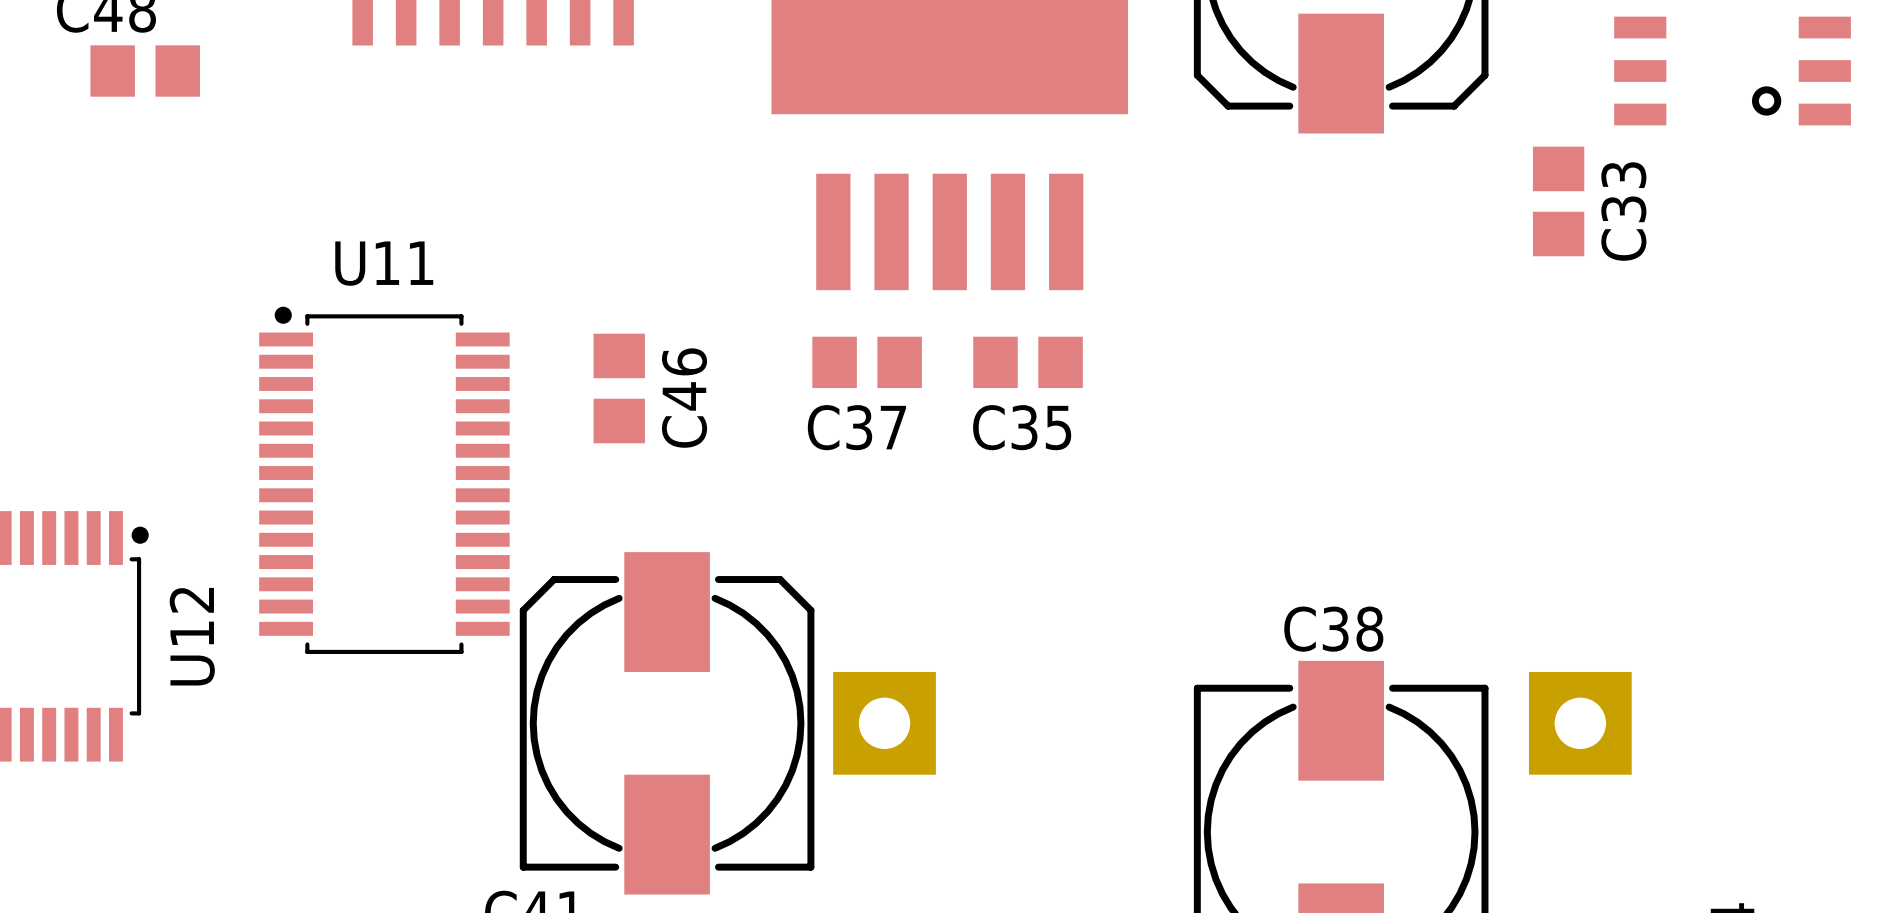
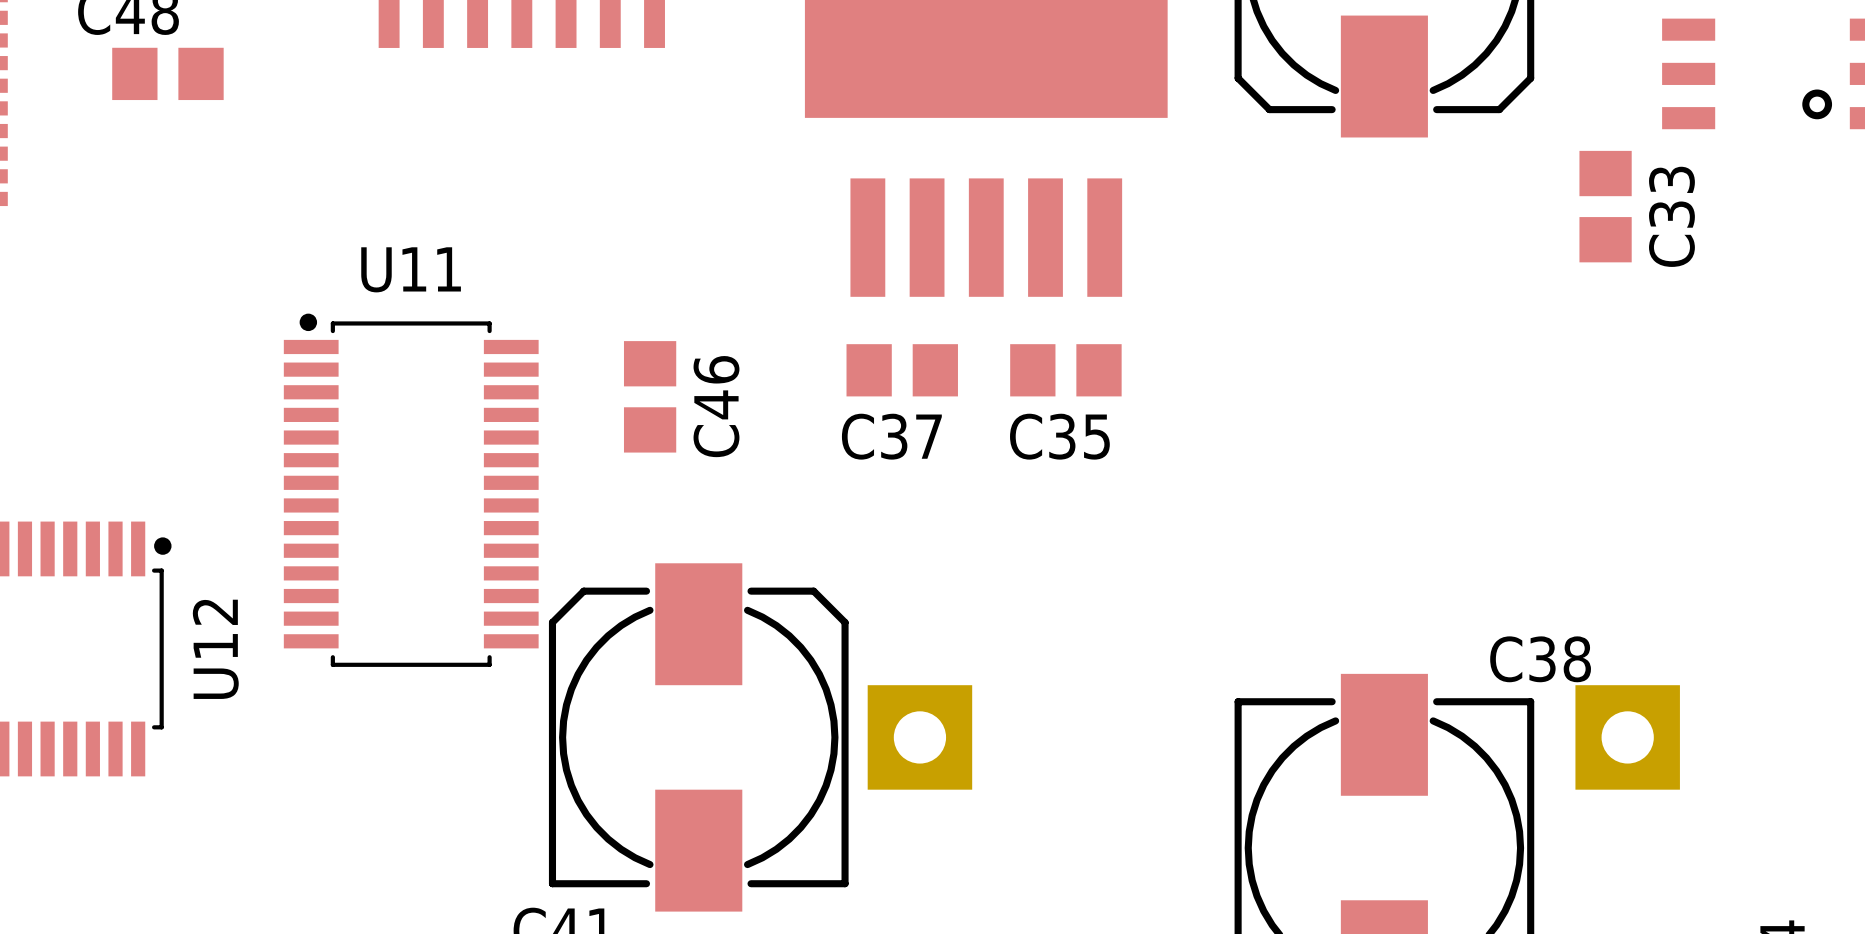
C38 name position: C38 (1333, 629) -> C38 (1540, 659)

